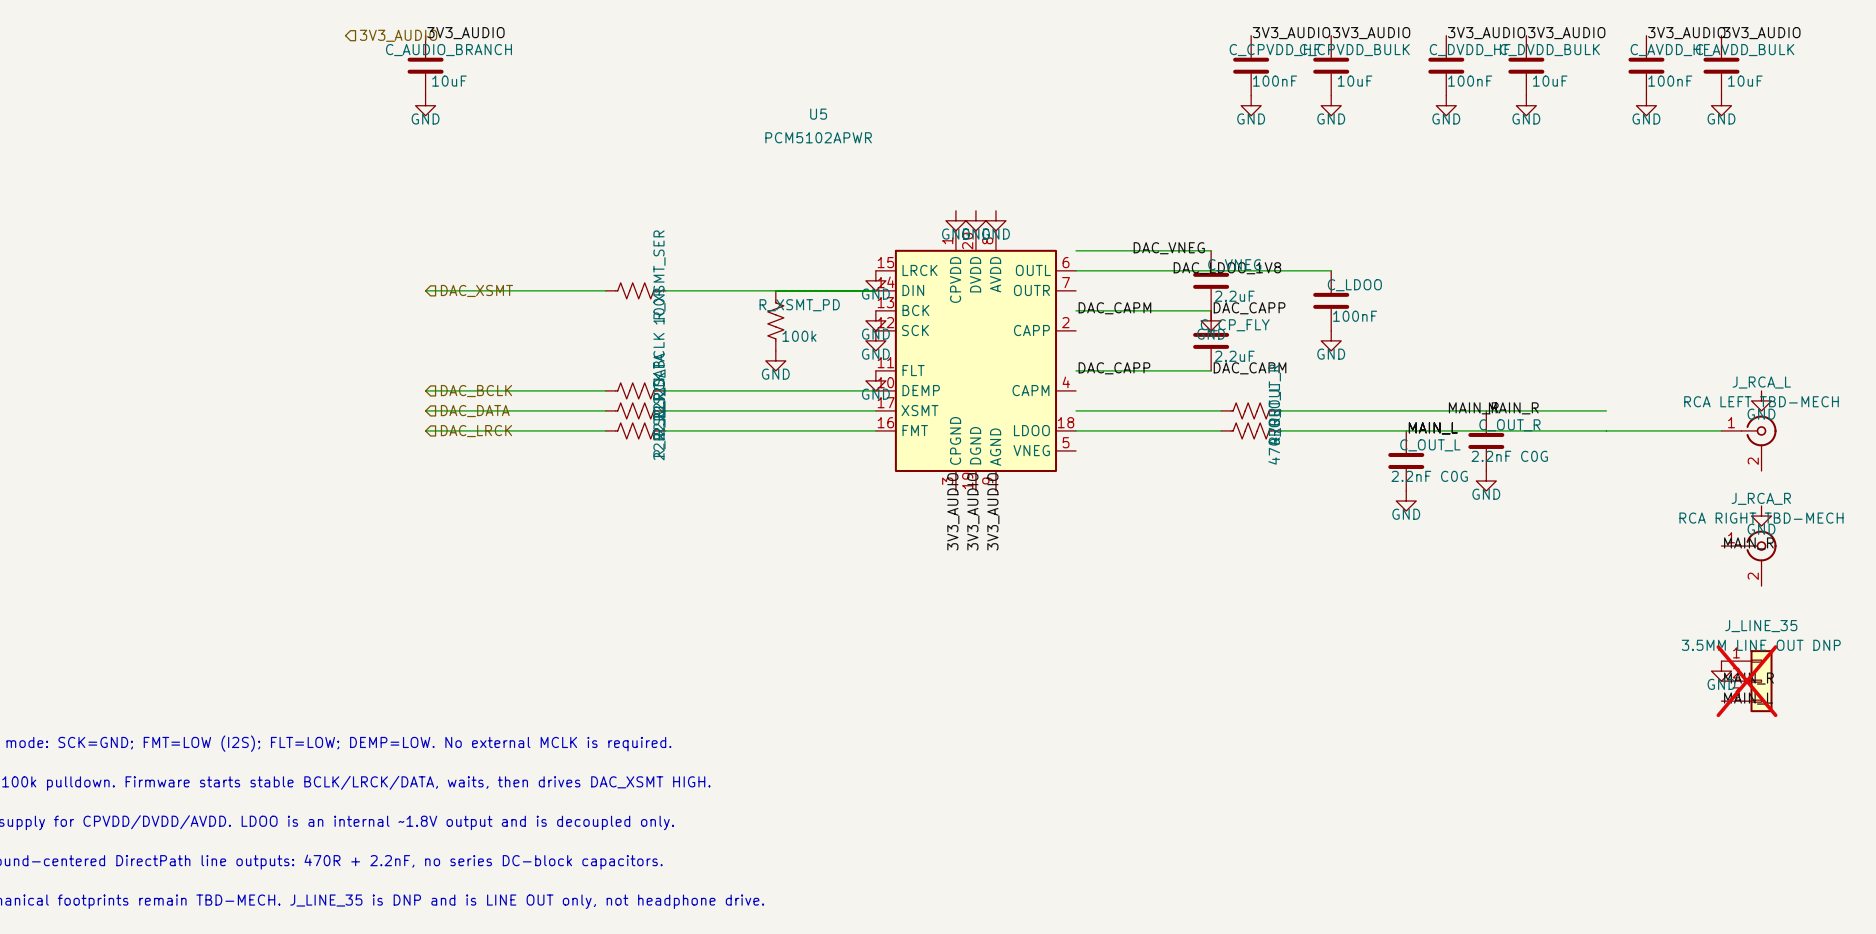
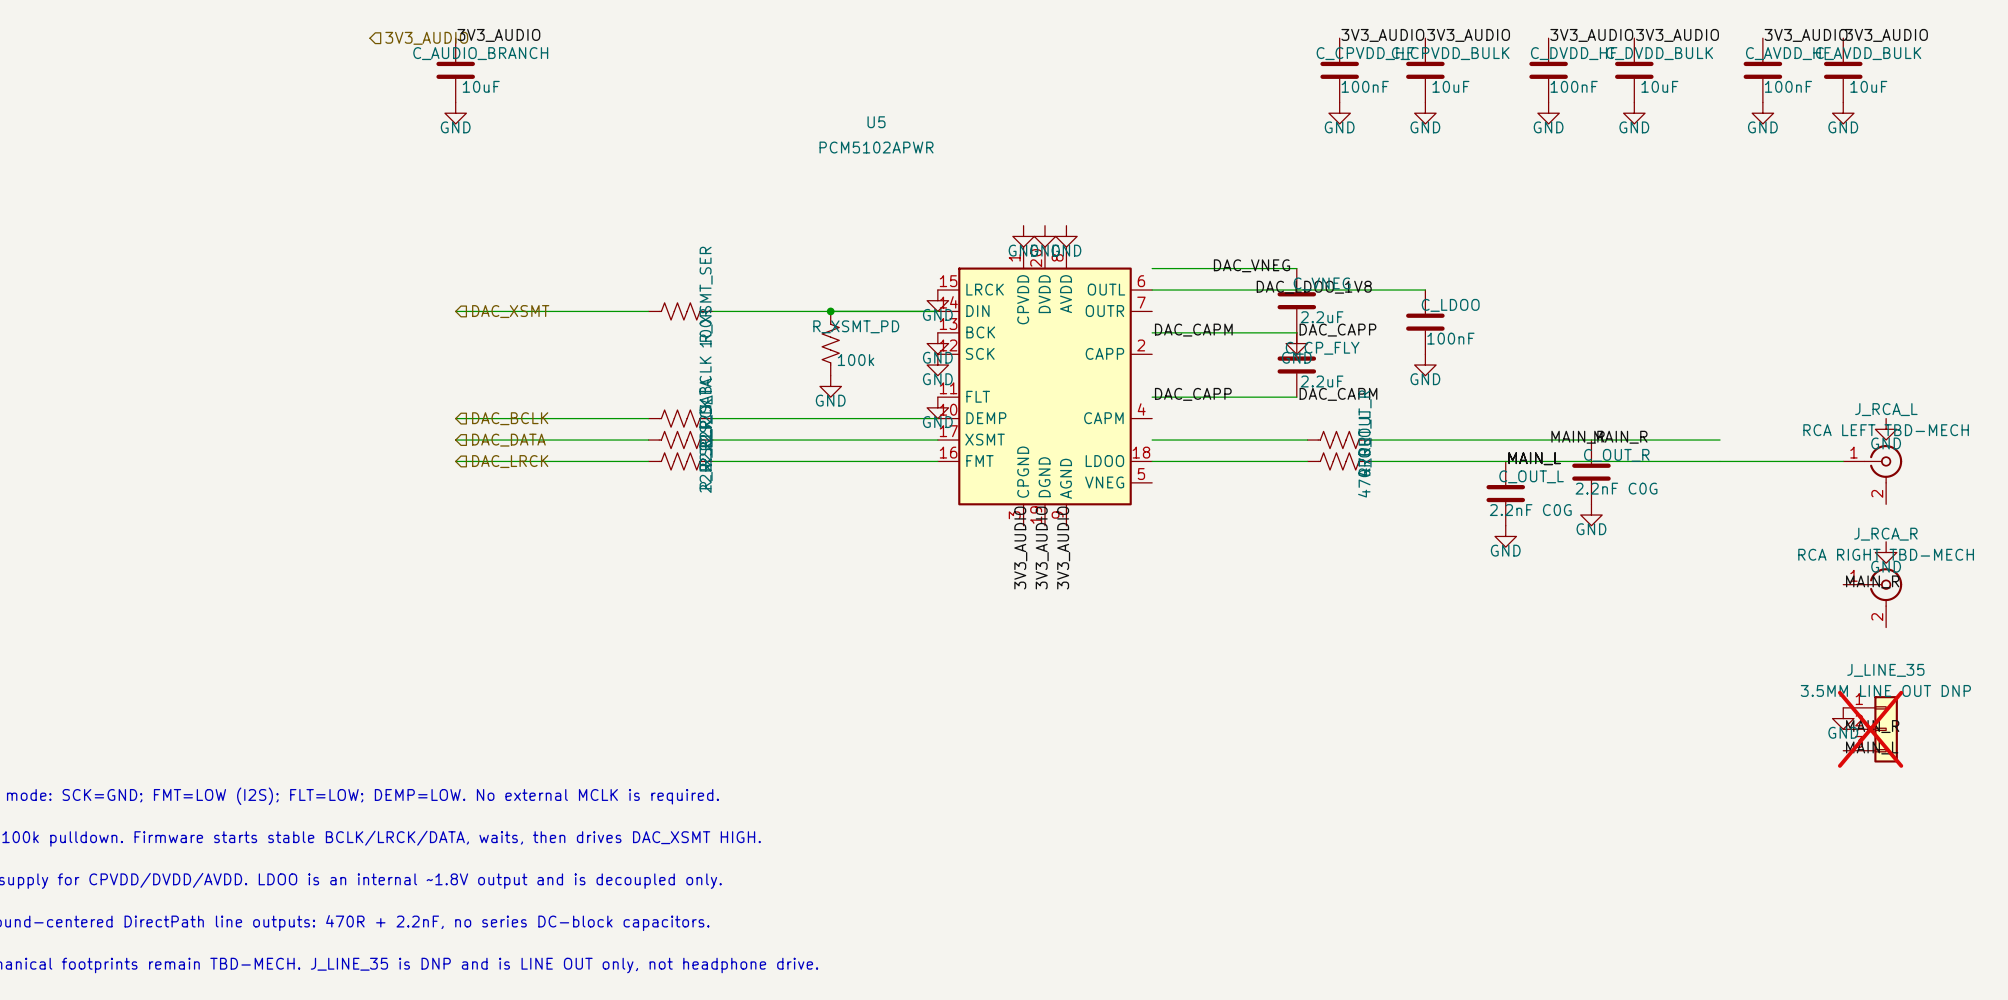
junction: none -> (830, 311)

